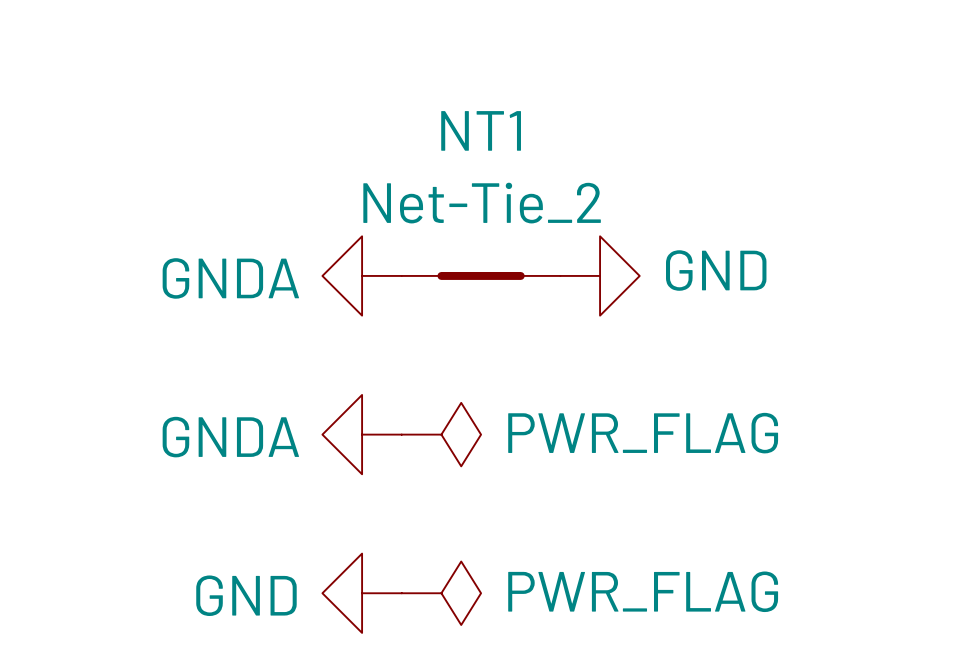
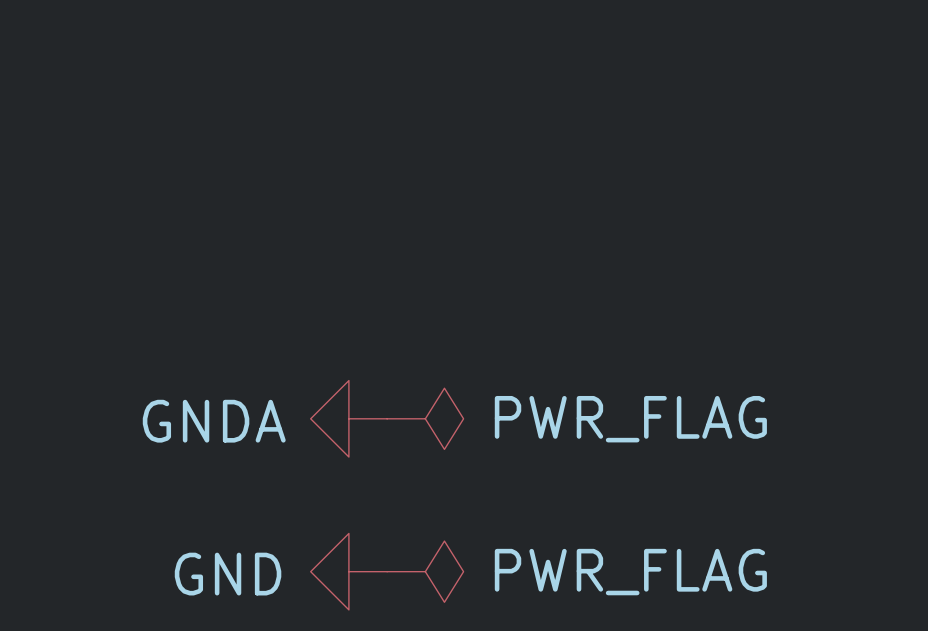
power symbol: GNDA (362, 275) -> none
NT1: Net-Tie_2 (481, 275) -> none
power symbol: GND (600, 275) -> none

